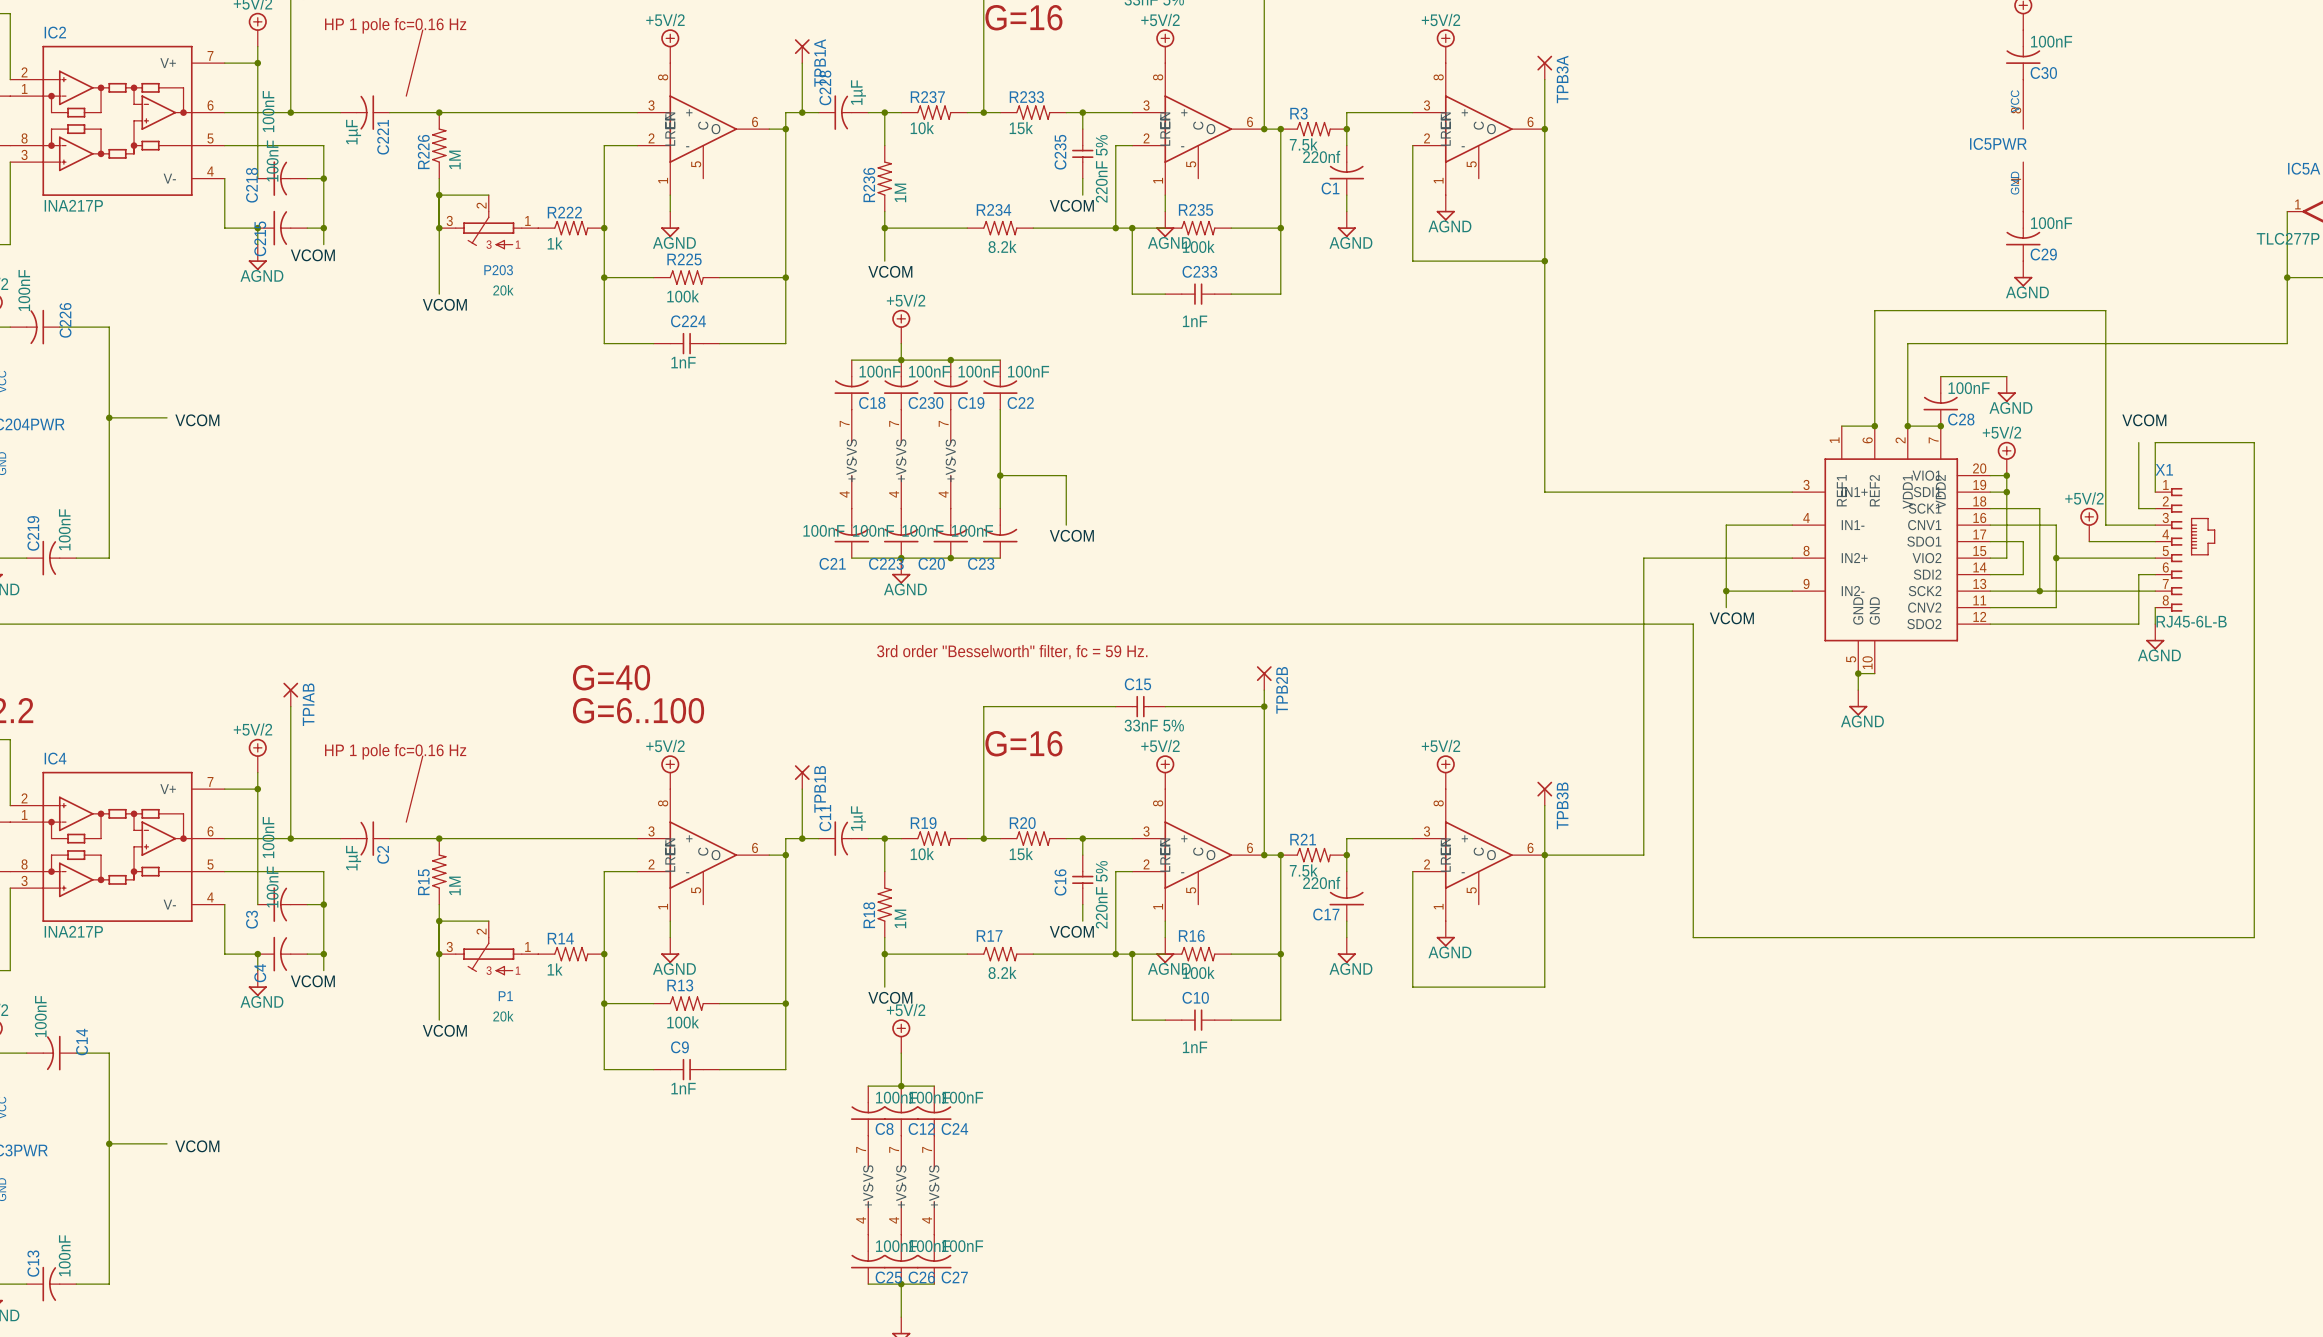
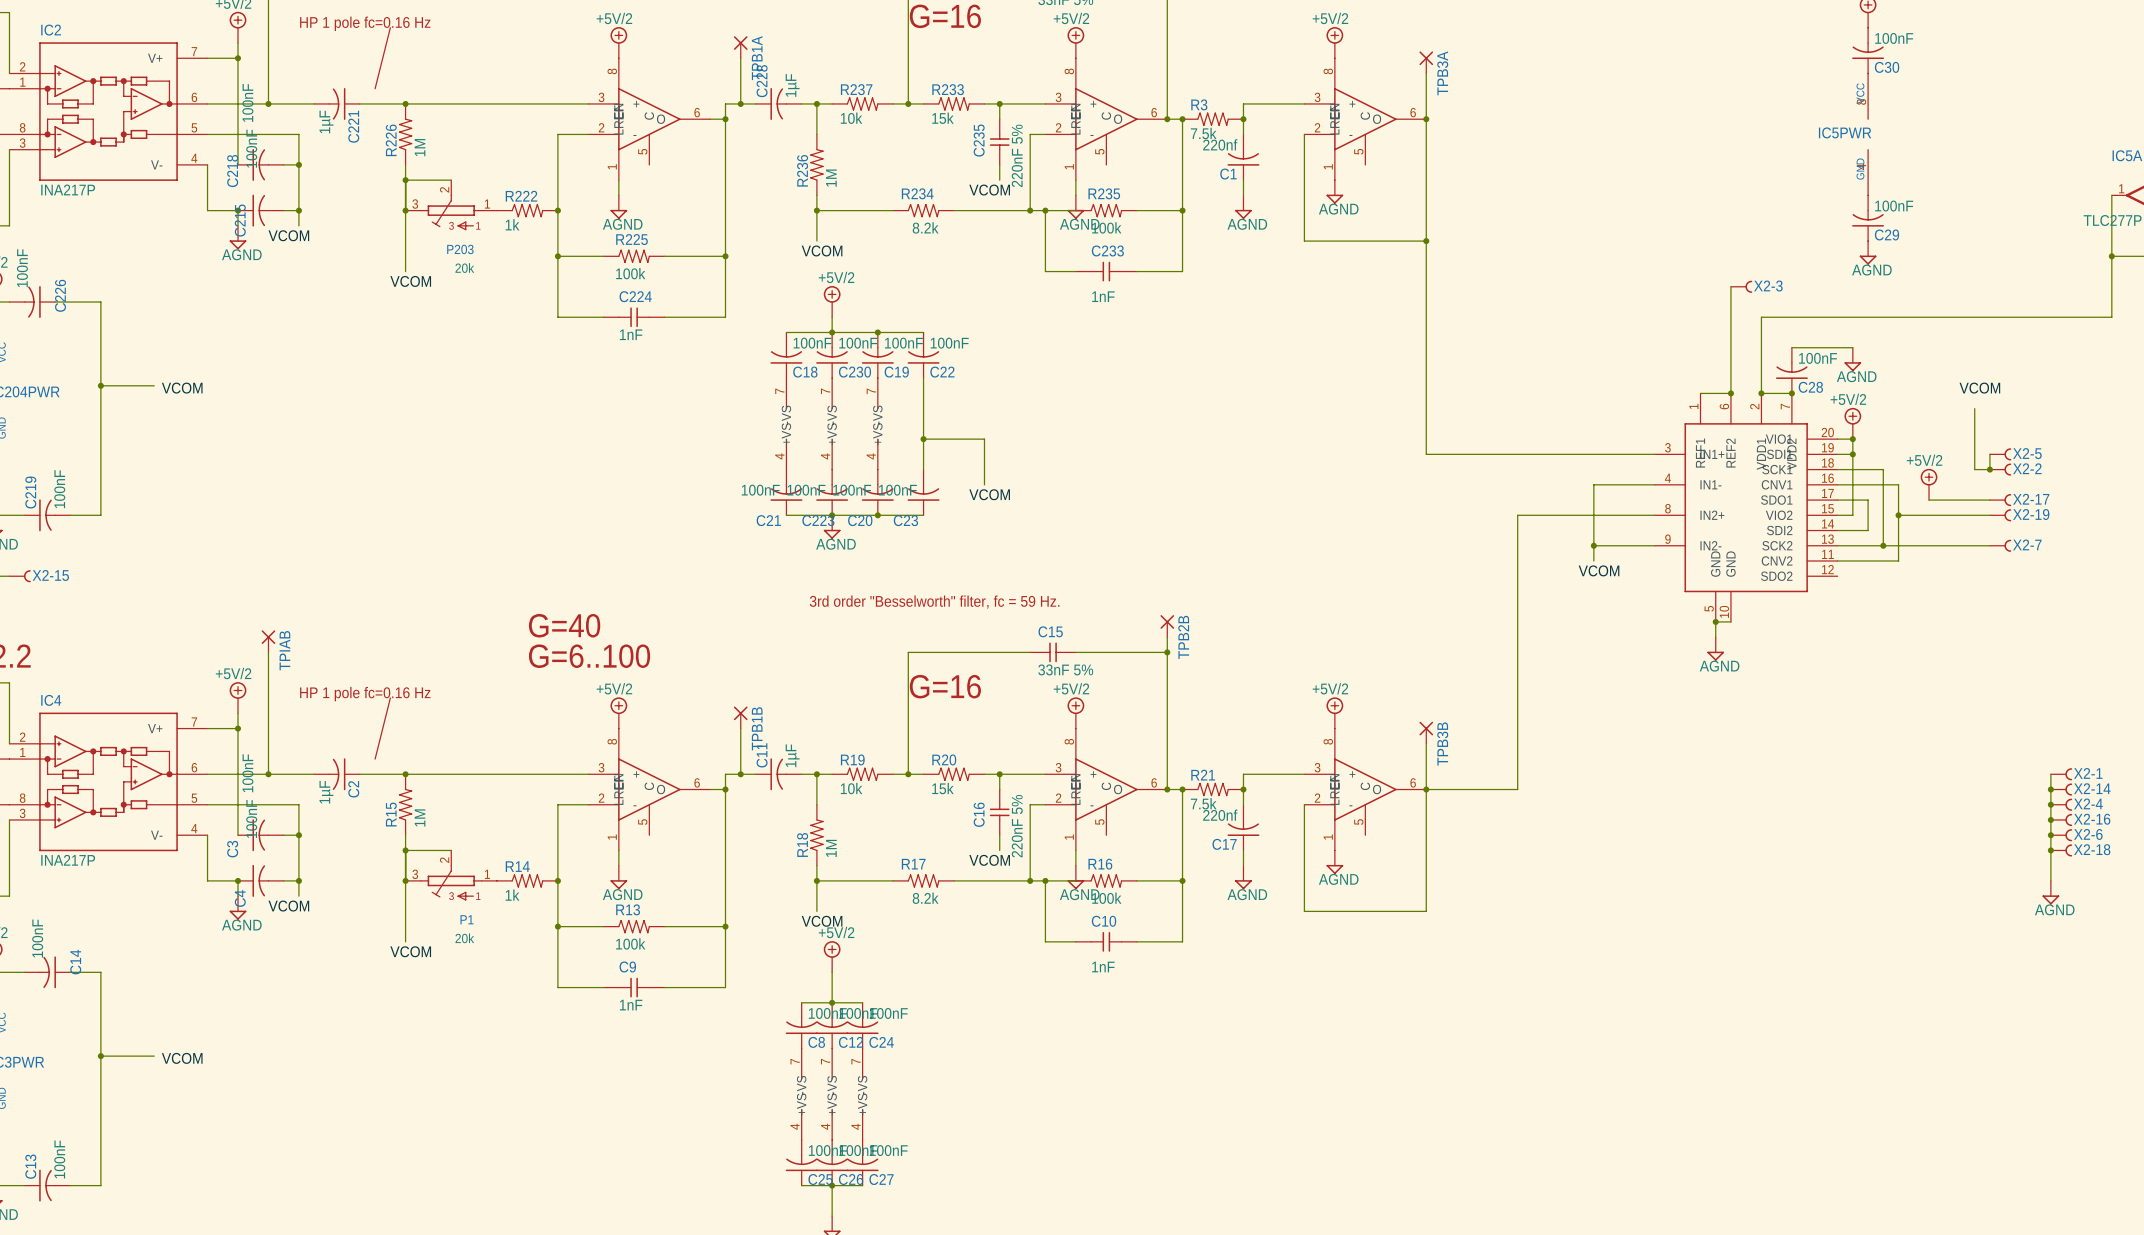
wire: (1874, 310) (2105, 310) (2105, 525) (2155, 525) -> none
X2-3: none -> (1741, 286)
wire: (2155, 492) (2155, 442) (2254, 442) (2254, 937) (1693, 937) (1693, 624) (10, 624) -> (1989, 454) (1989, 469)
X2-5: none -> (2000, 454)
junction: none -> (1989, 469)
X2-2: none -> (2000, 469)
X2-17: none -> (2000, 500)
X1: RJ45-6L-B (2185, 549) -> none
X2-19: none -> (2000, 515)
wire: (2155, 574) (2138, 574) (2138, 624) (1990, 624) -> none
X2-7: none -> (2000, 545)
wire: (2155, 607) (2155, 624) -> none
X2-15: none -> (20, 576)
power symbol: AGND (2155, 636) -> none
wire: none -> (2050, 774) (2050, 880)
X2-1: none -> (2061, 774)
junction: none -> (2050, 789)
X2-14: none -> (2061, 789)
junction: none -> (2050, 804)
X2-4: none -> (2061, 804)
junction: none -> (2050, 819)
X2-16: none -> (2061, 819)
junction: none -> (2050, 835)
X2-6: none -> (2061, 835)
junction: none -> (2050, 850)
X2-18: none -> (2061, 850)
power symbol: none -> AGND (2050, 892)

